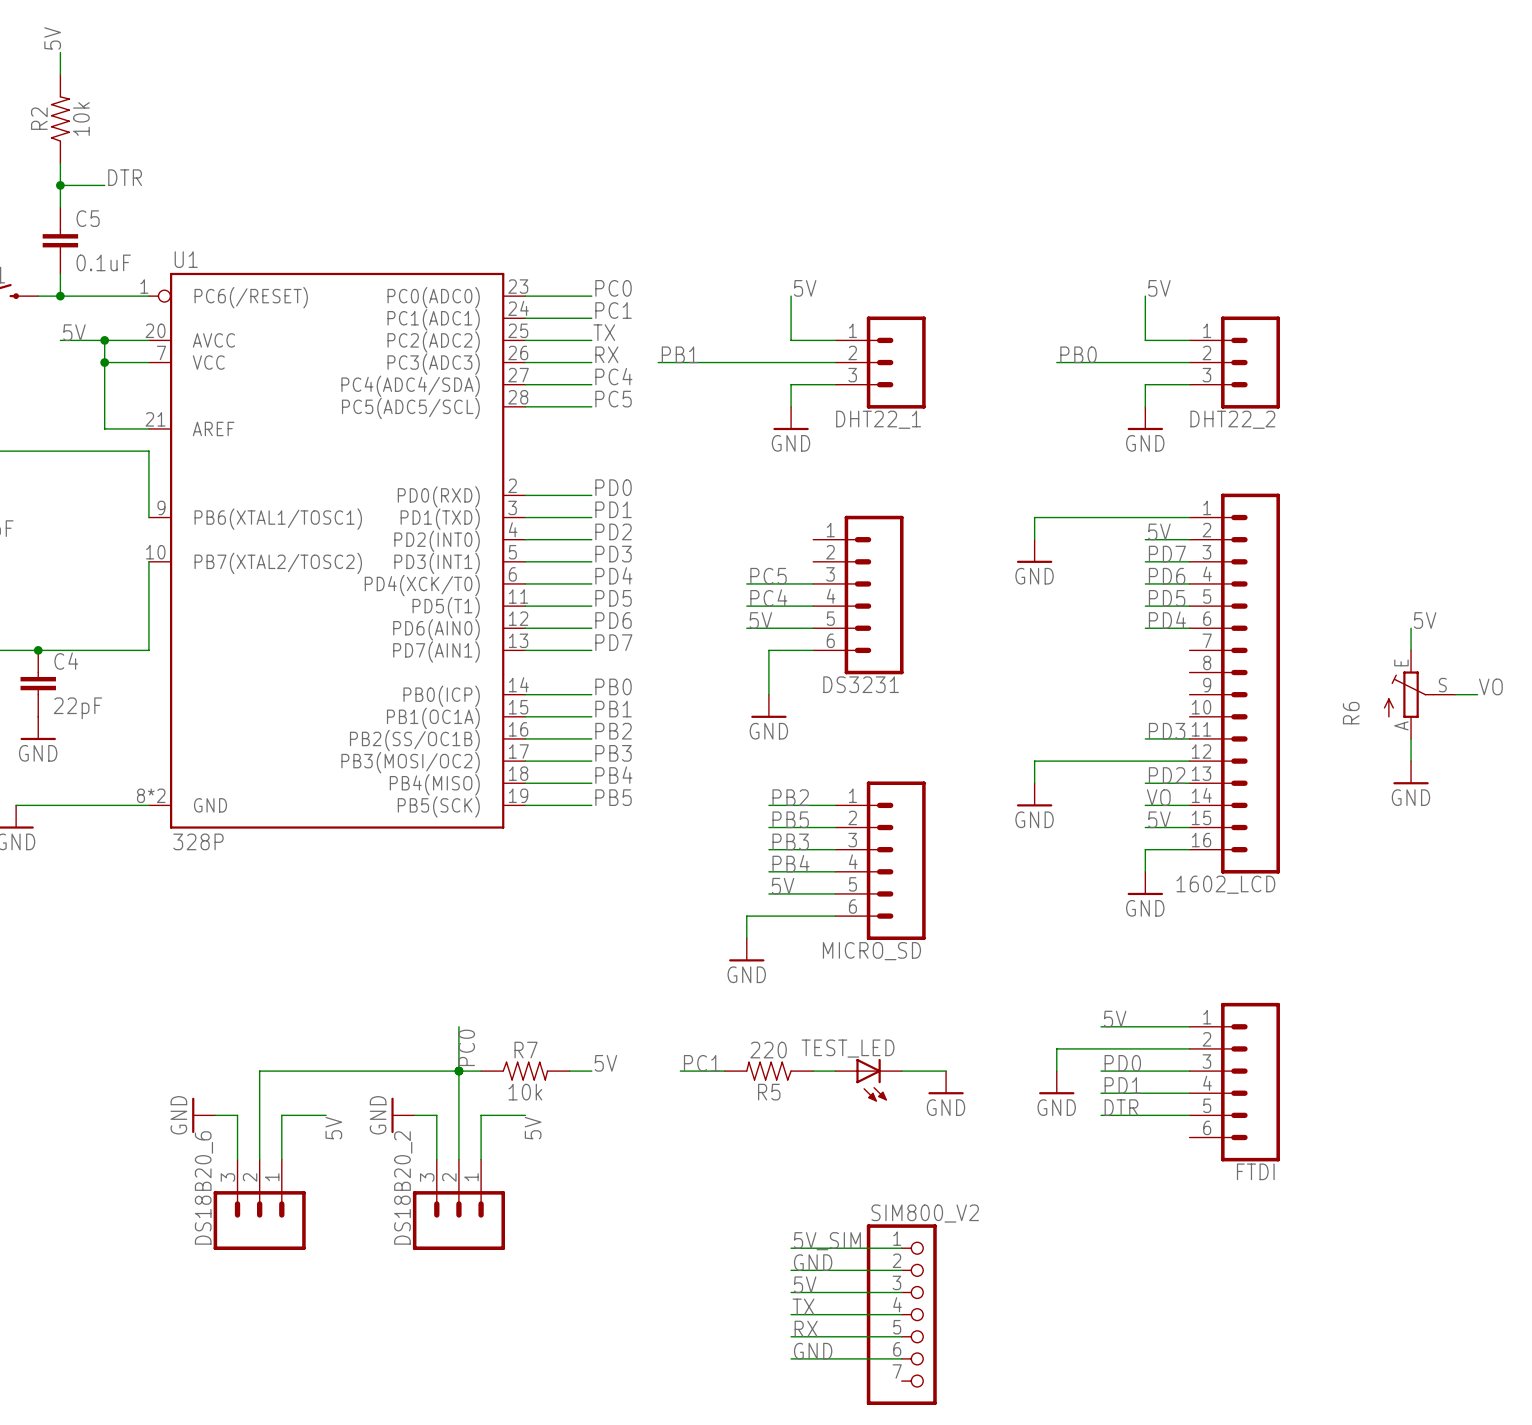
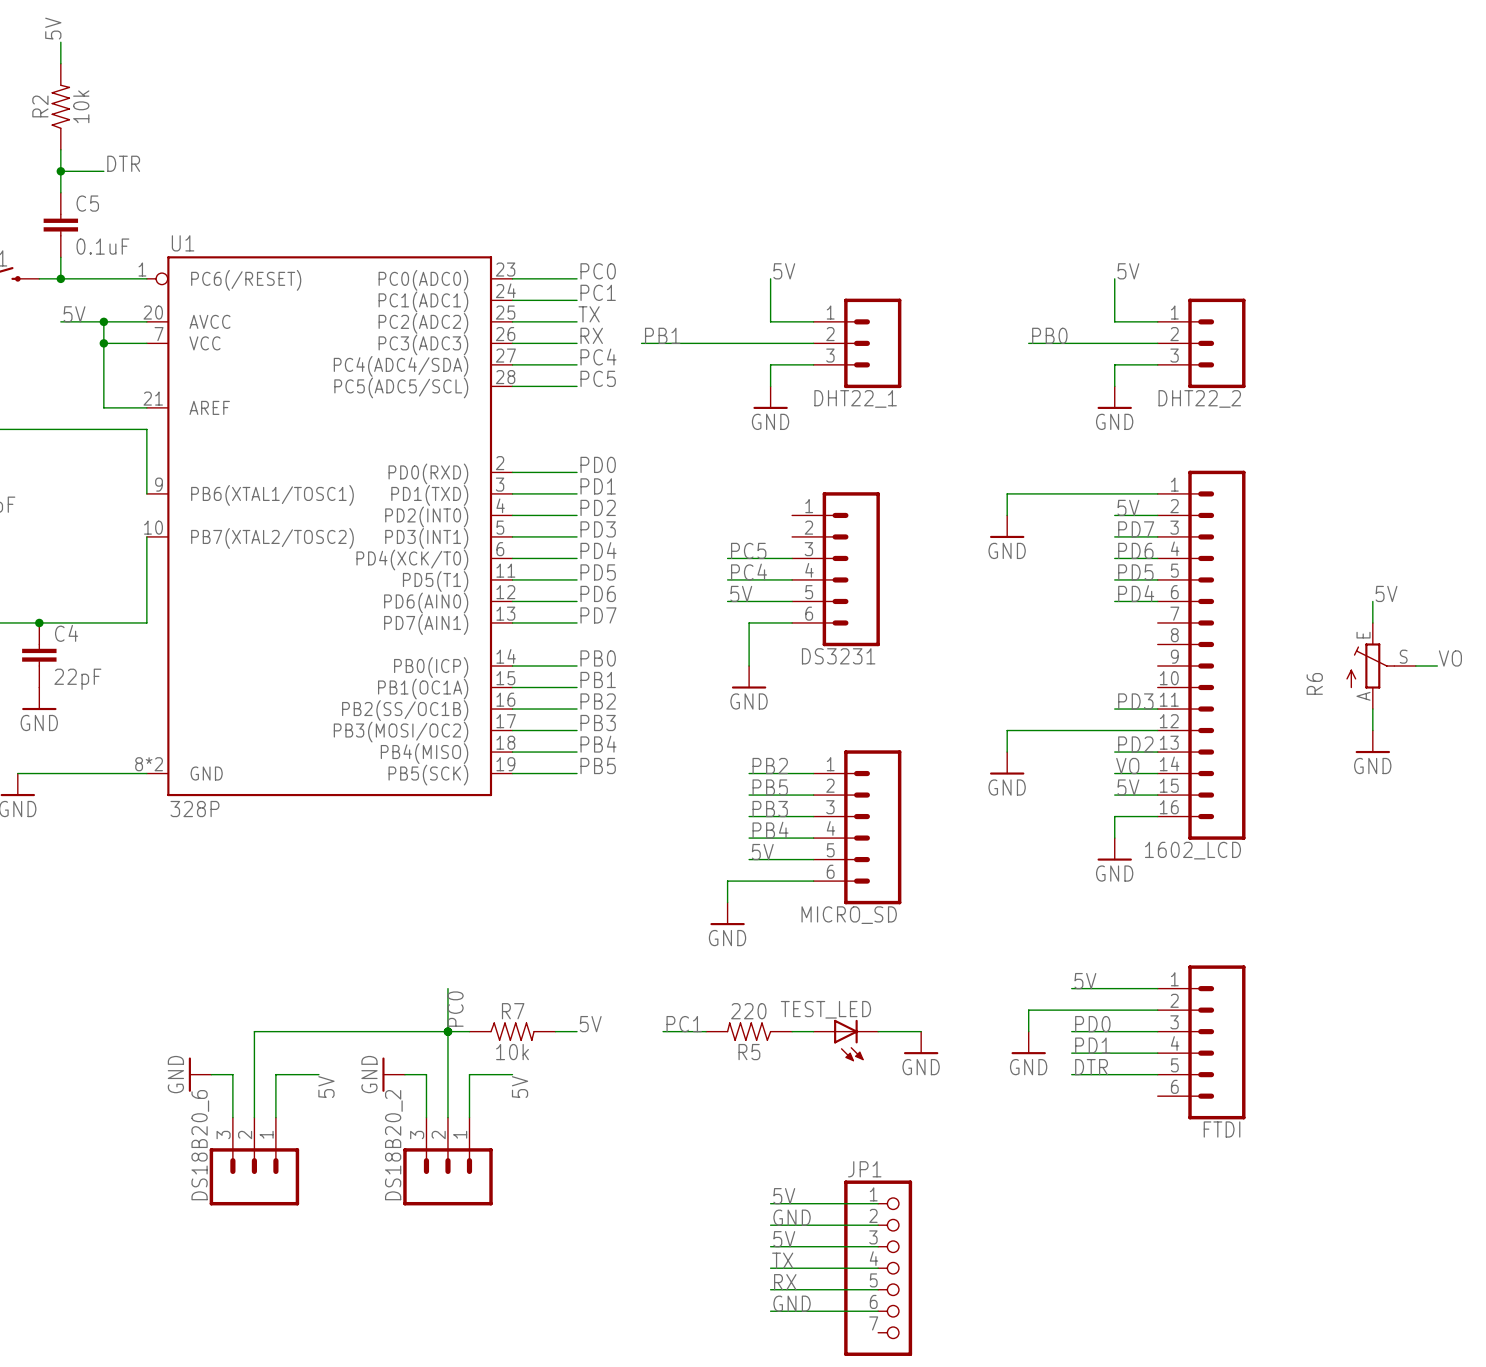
SIM800_V2 name: SIM800_V2 (925, 1213) -> JP1 (864, 1169)
label: 5V_SIM (827, 1241) -> 5V (784, 1196)

